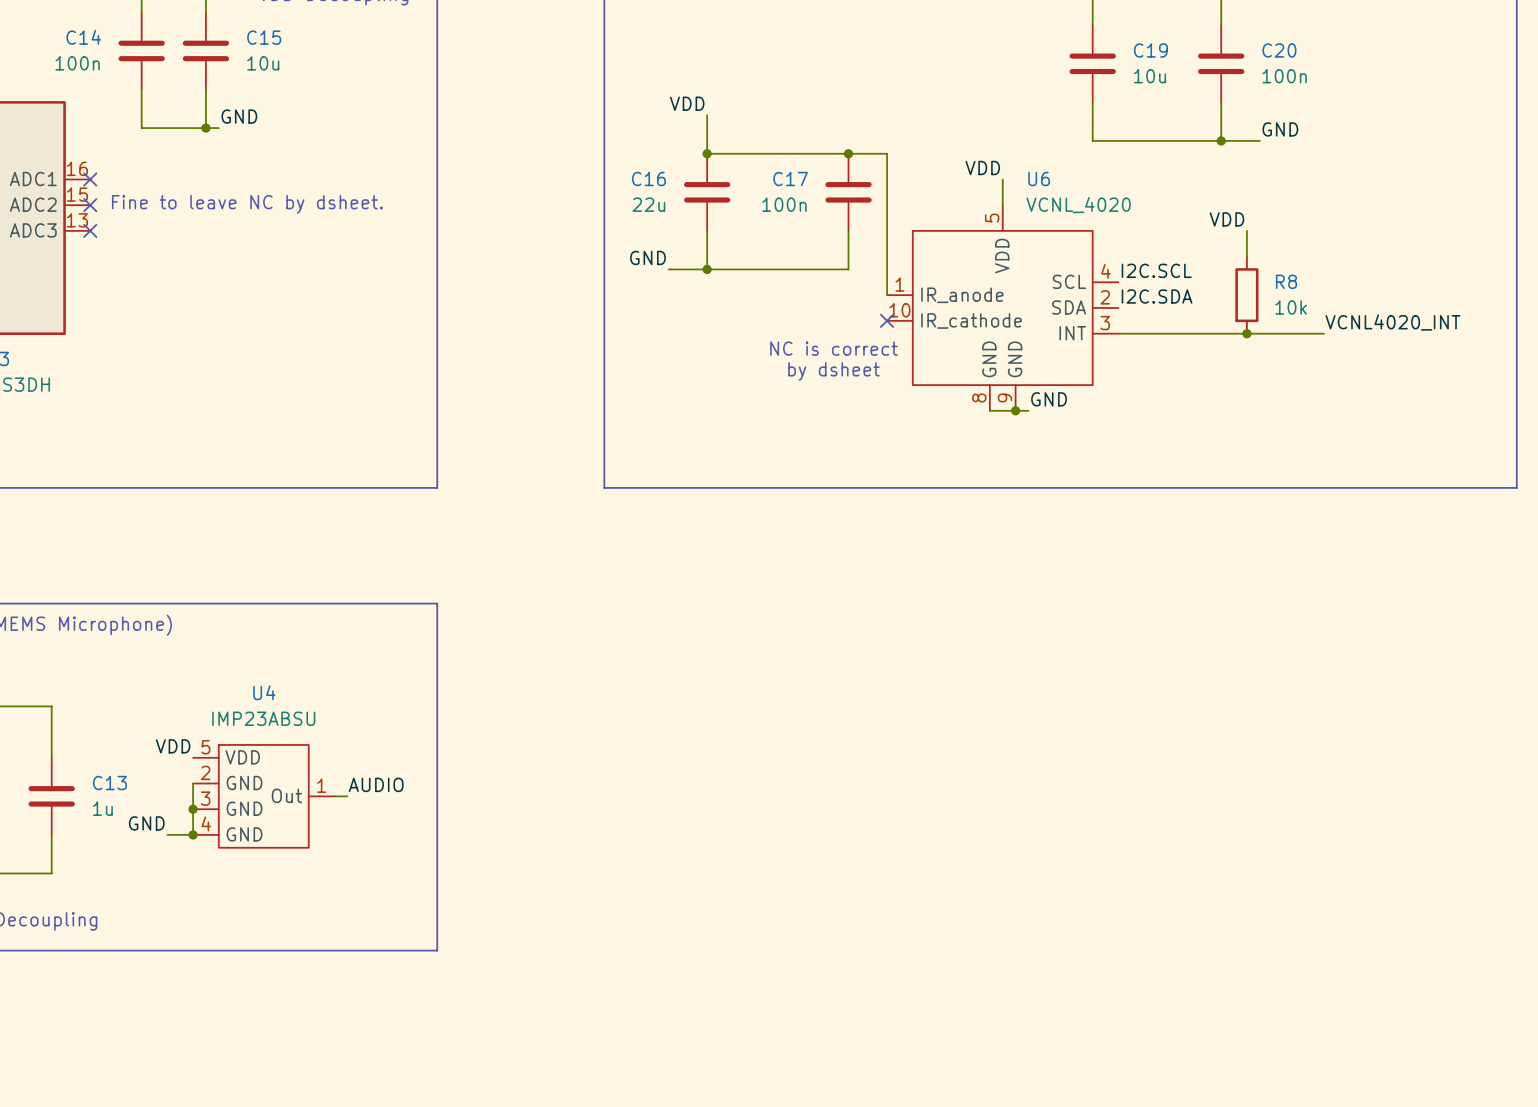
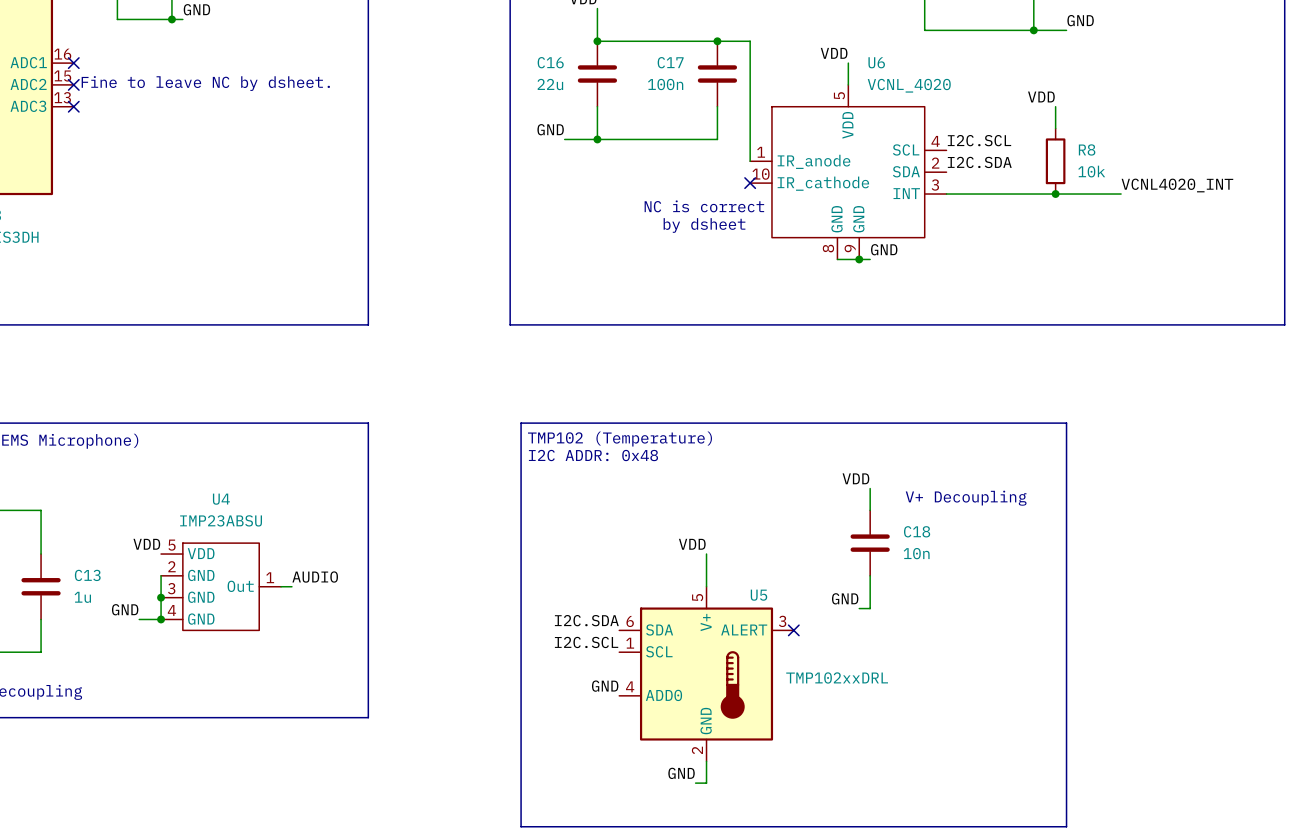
line: none -> (521, 423) (1066, 423) (1066, 826) (521, 826) (521, 423)
text: none -> TMP102 (Temperature) (619, 439)
text: none -> I2C ADDR: 0x48 (593, 455)
label: none -> VDD (855, 478)
wire: none -> (870, 488) (870, 510)
text: none -> V+ Decoupling (966, 498)
C18: none -> 10n (870, 543)
label: none -> VDD (692, 544)
wire: none -> (706, 554) (706, 586)
wire: none -> (870, 575) (870, 608) (859, 608)
label: none -> GND (845, 598)
label: none -> I2C.SDA (586, 620)
no-connect mark: none -> (793, 630)
label: none -> I2C.SCL (586, 642)
U5: none -> TMP102xxDRL (706, 674)
label: none -> GND (605, 686)
wire: none -> (706, 761) (706, 783) (695, 783)
label: none -> GND (681, 773)

